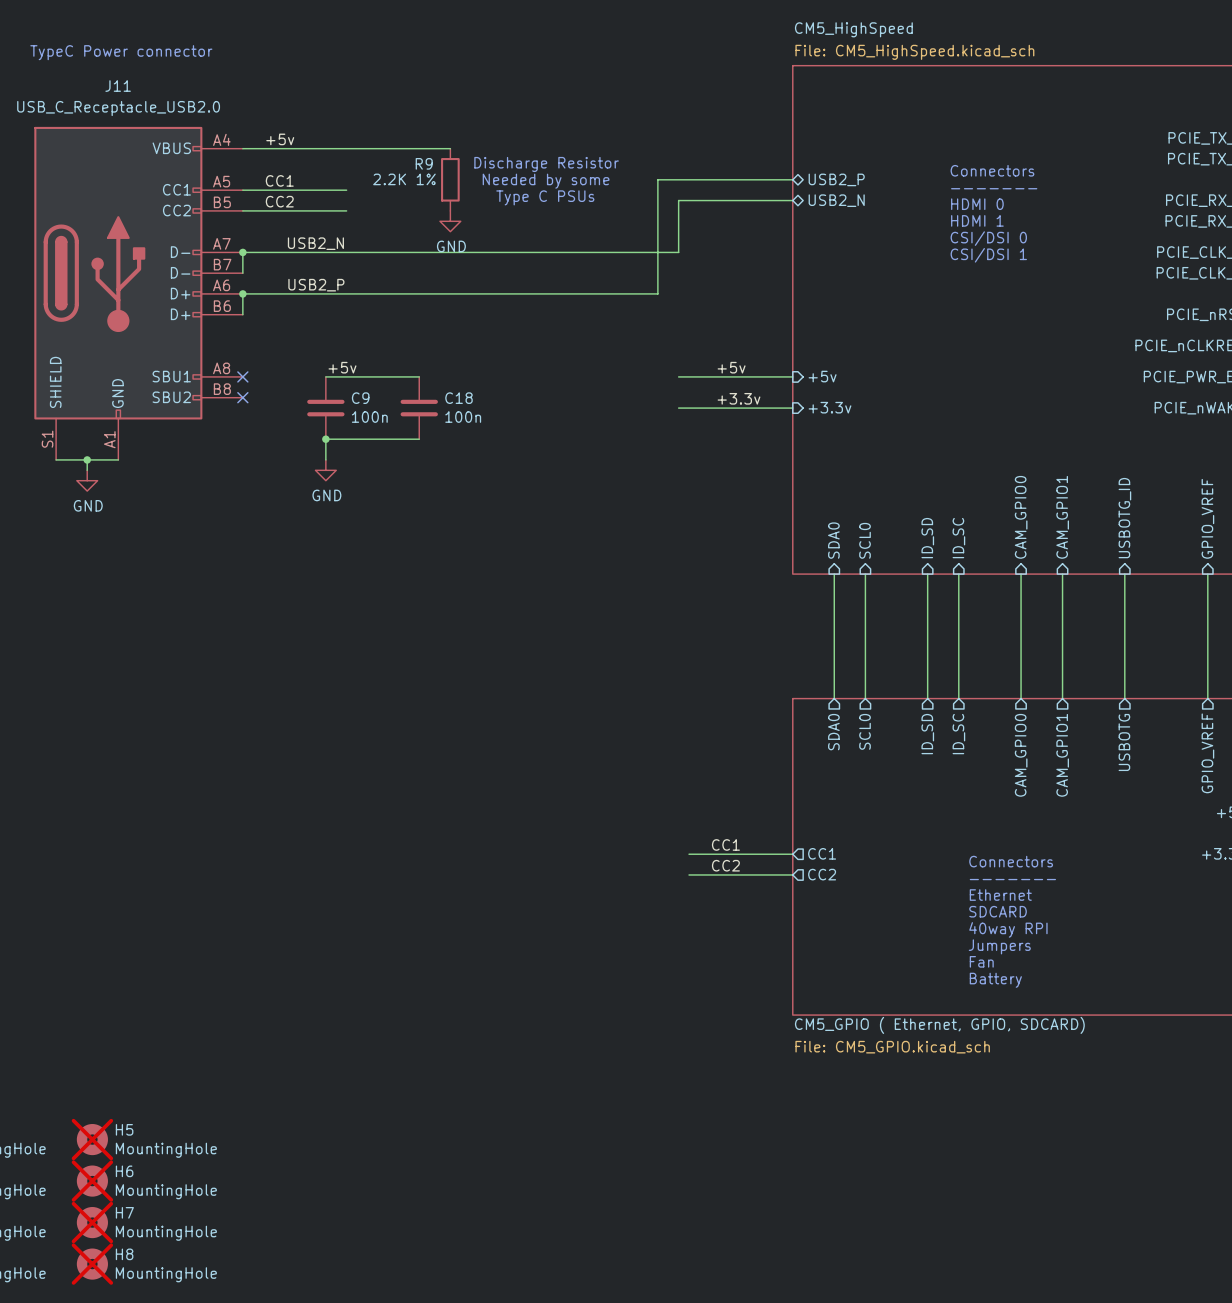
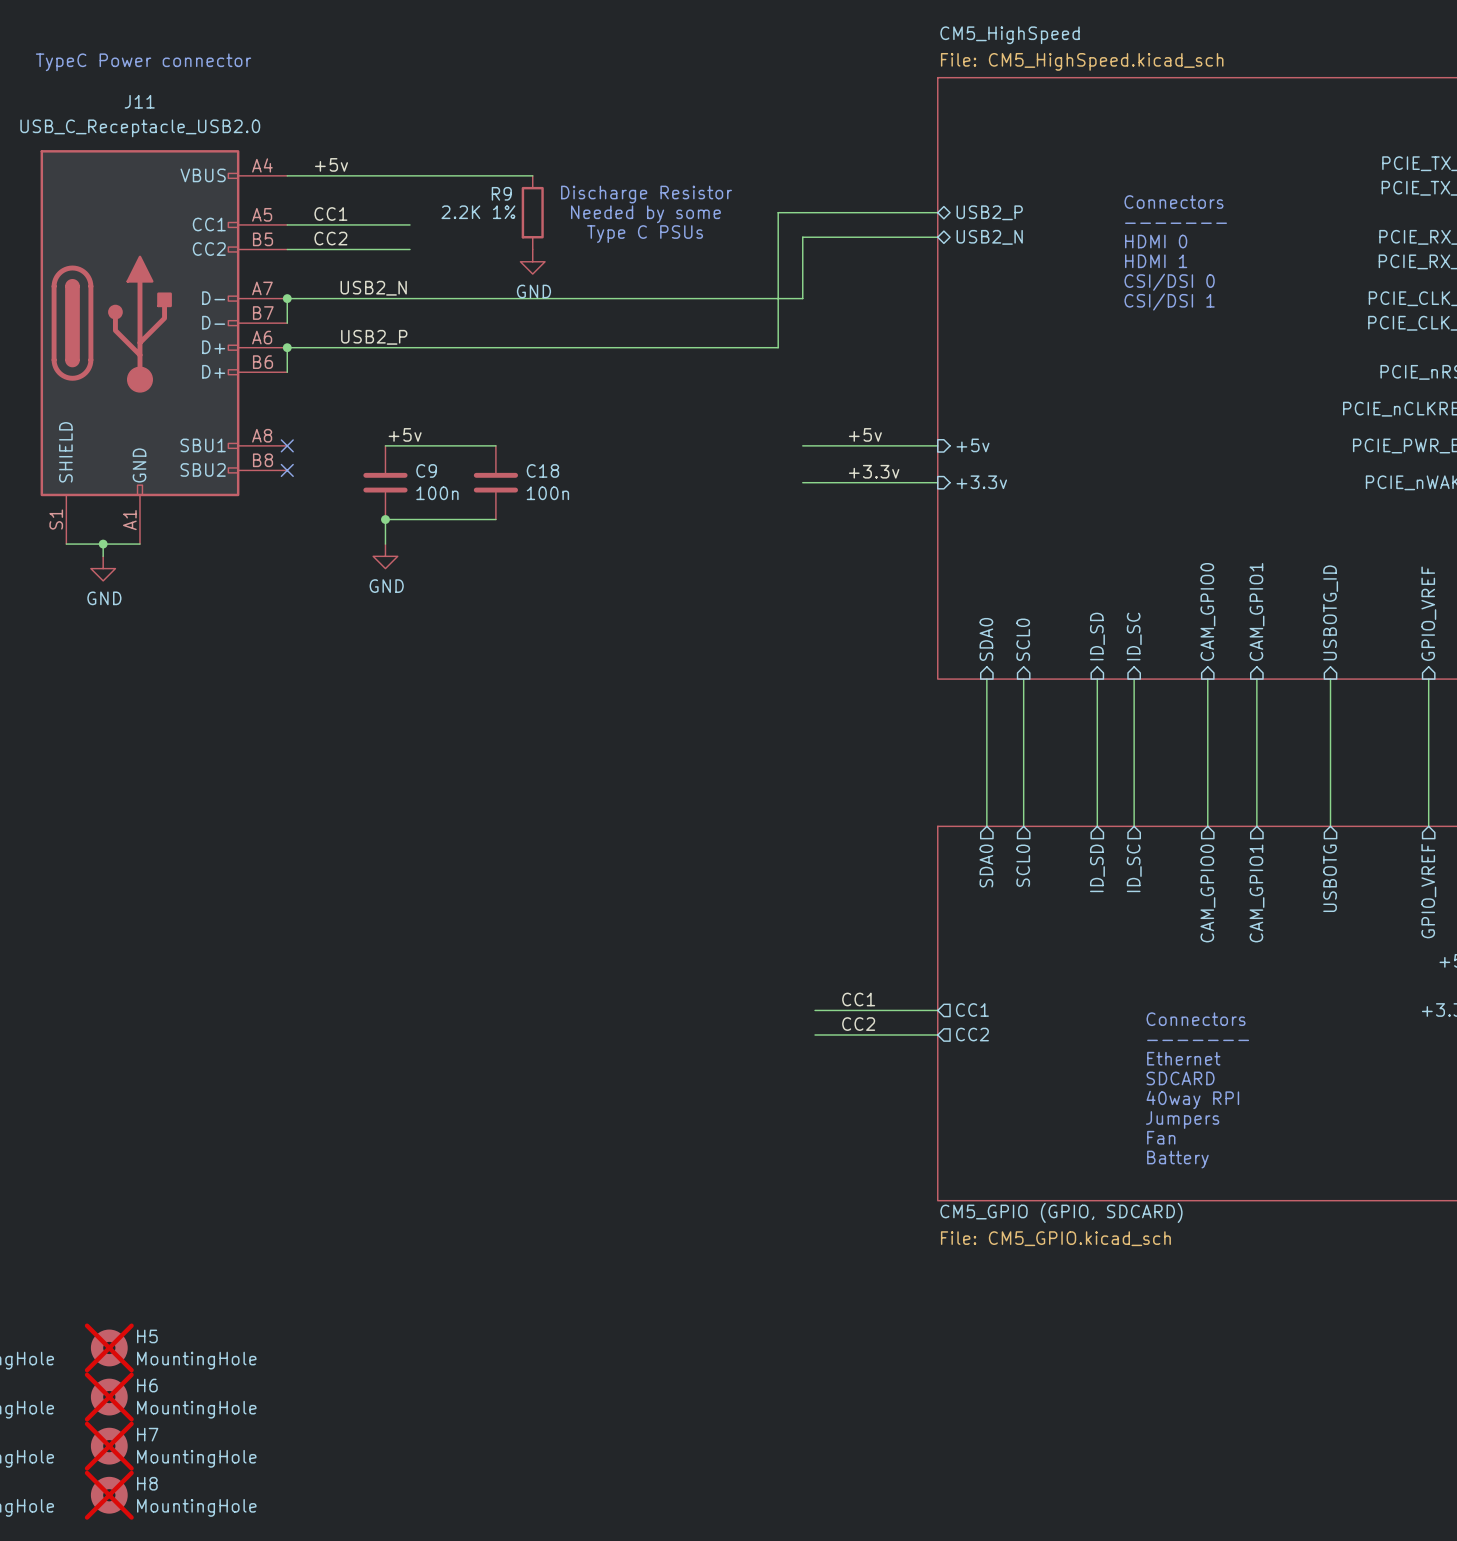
sheet CM5_GPIO (GPIO, SDCARD) name: CM5_GPIO ( Ethernet, GPIO, SDCARD) (939, 1025) -> CM5_GPIO (GPIO, SDCARD) (1061, 1212)

